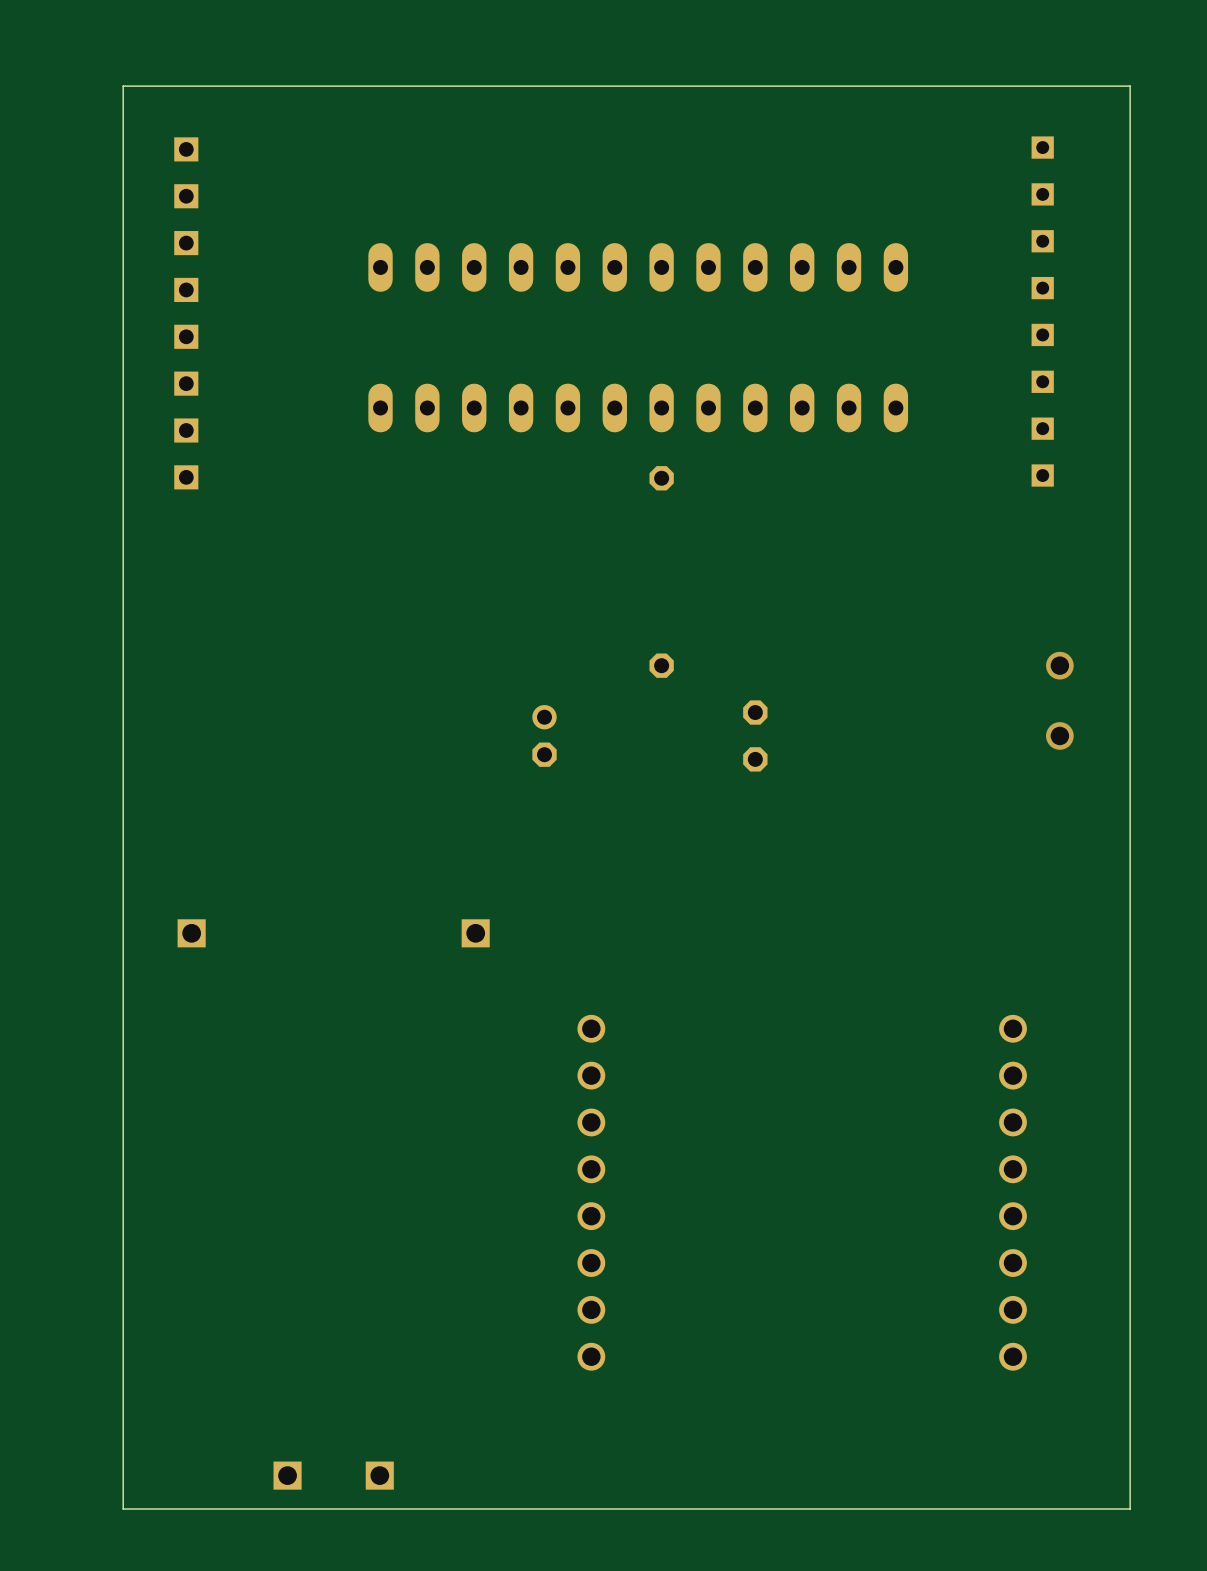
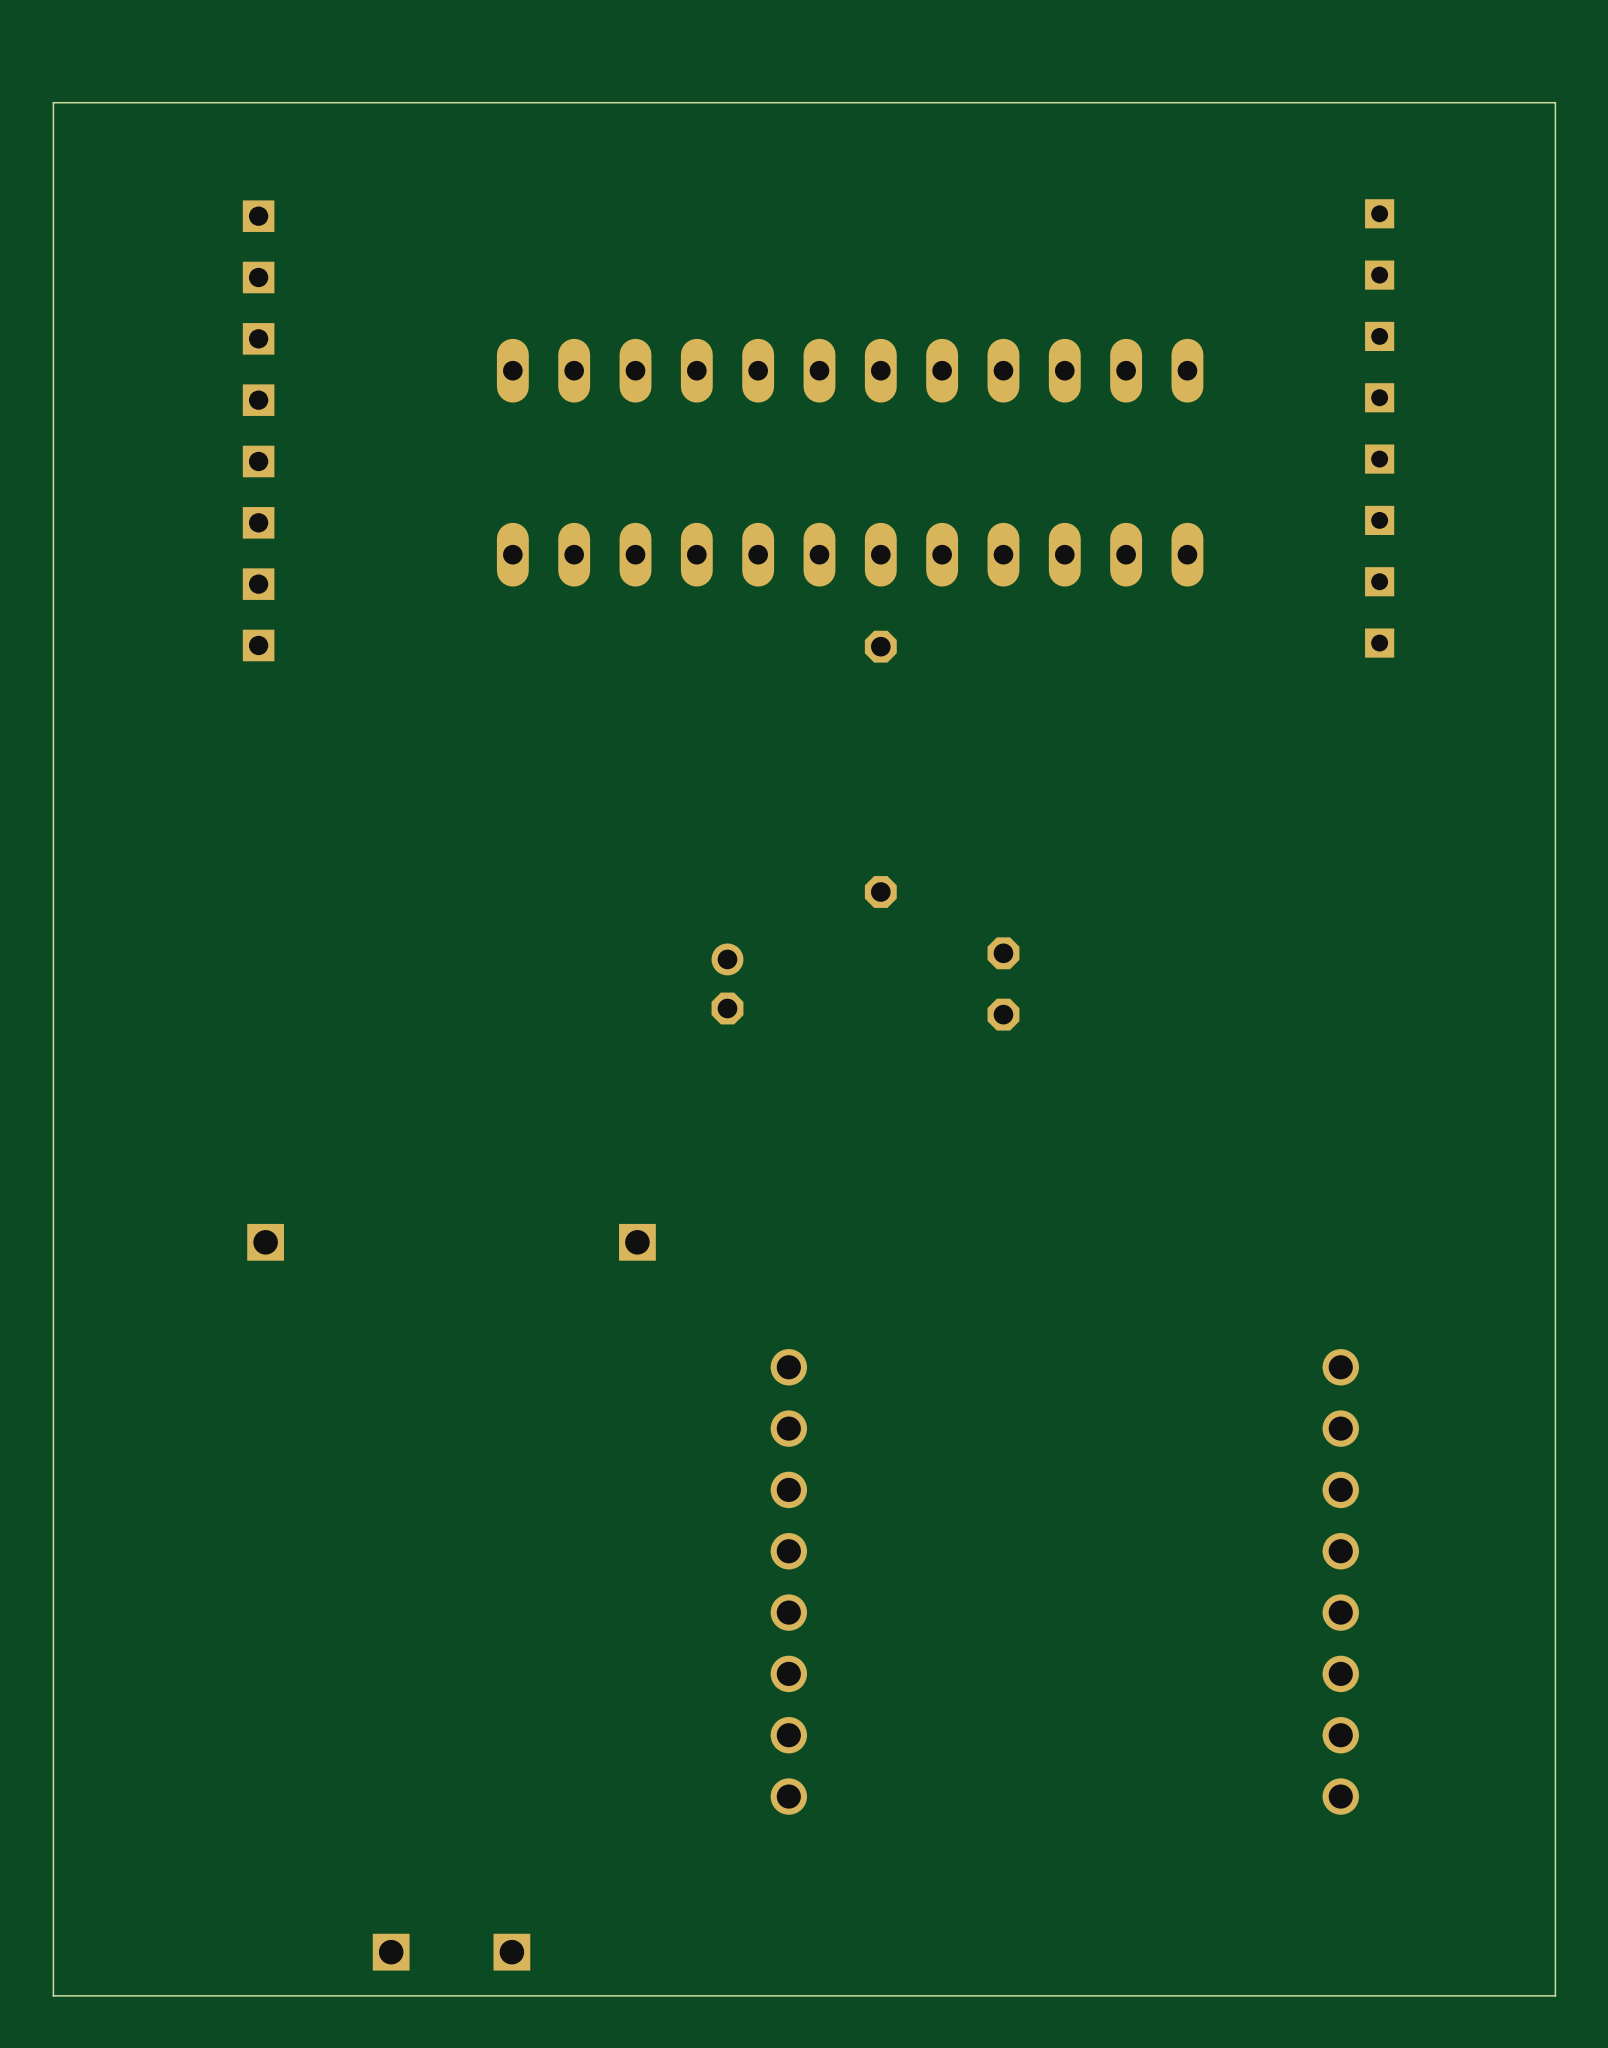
via: (1059, 665) -> none
via: (1059, 735) -> none
board edge: (1130, 1508) (1130, 86) (123, 86) (123, 1508) -> (1494, 1995) (1555, 1995) (1555, 102) (53, 102) (53, 1995) (176, 1995)

